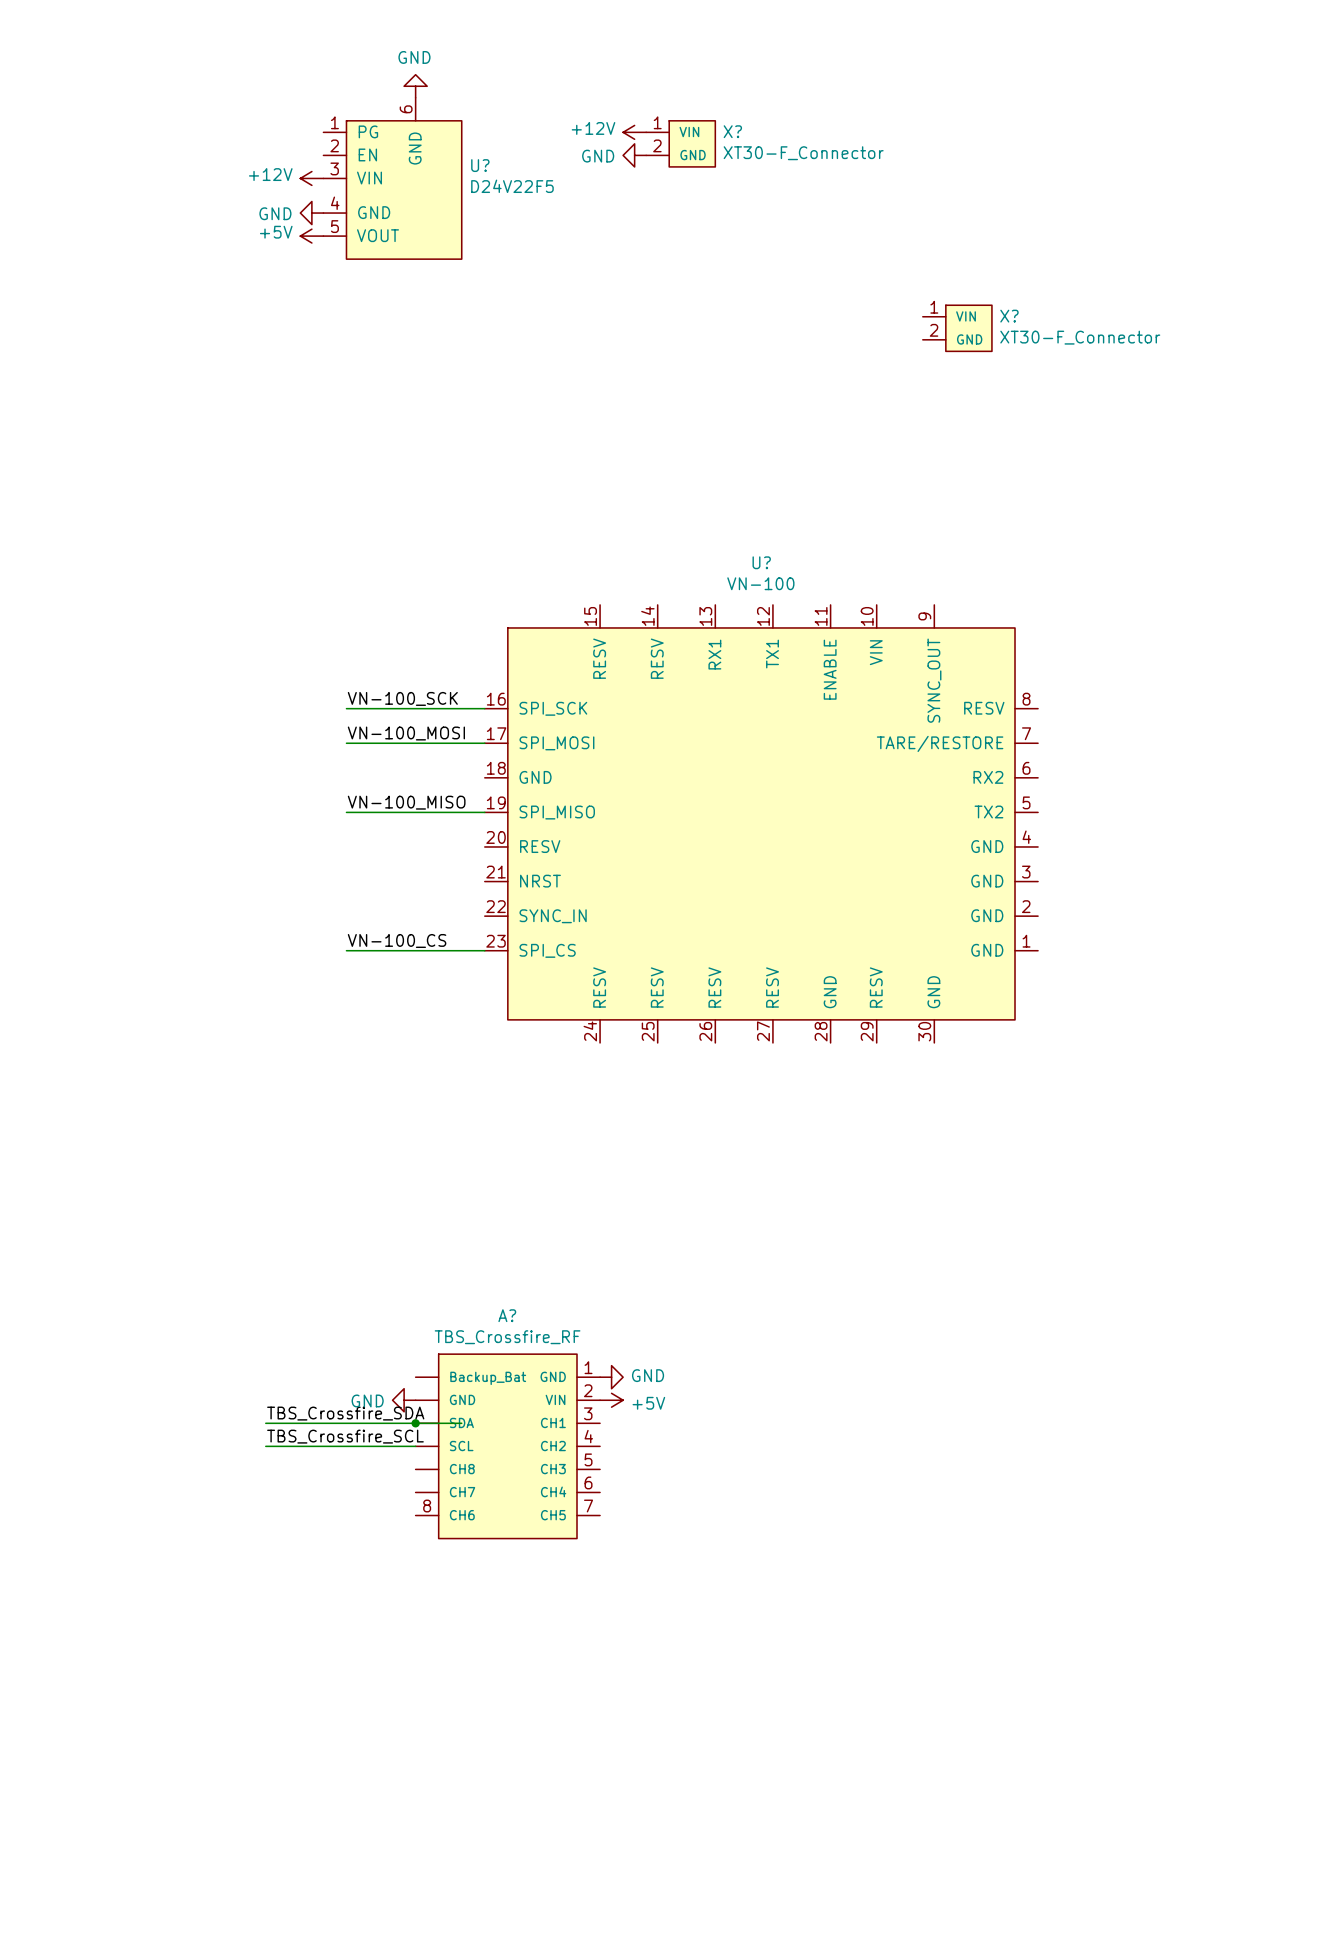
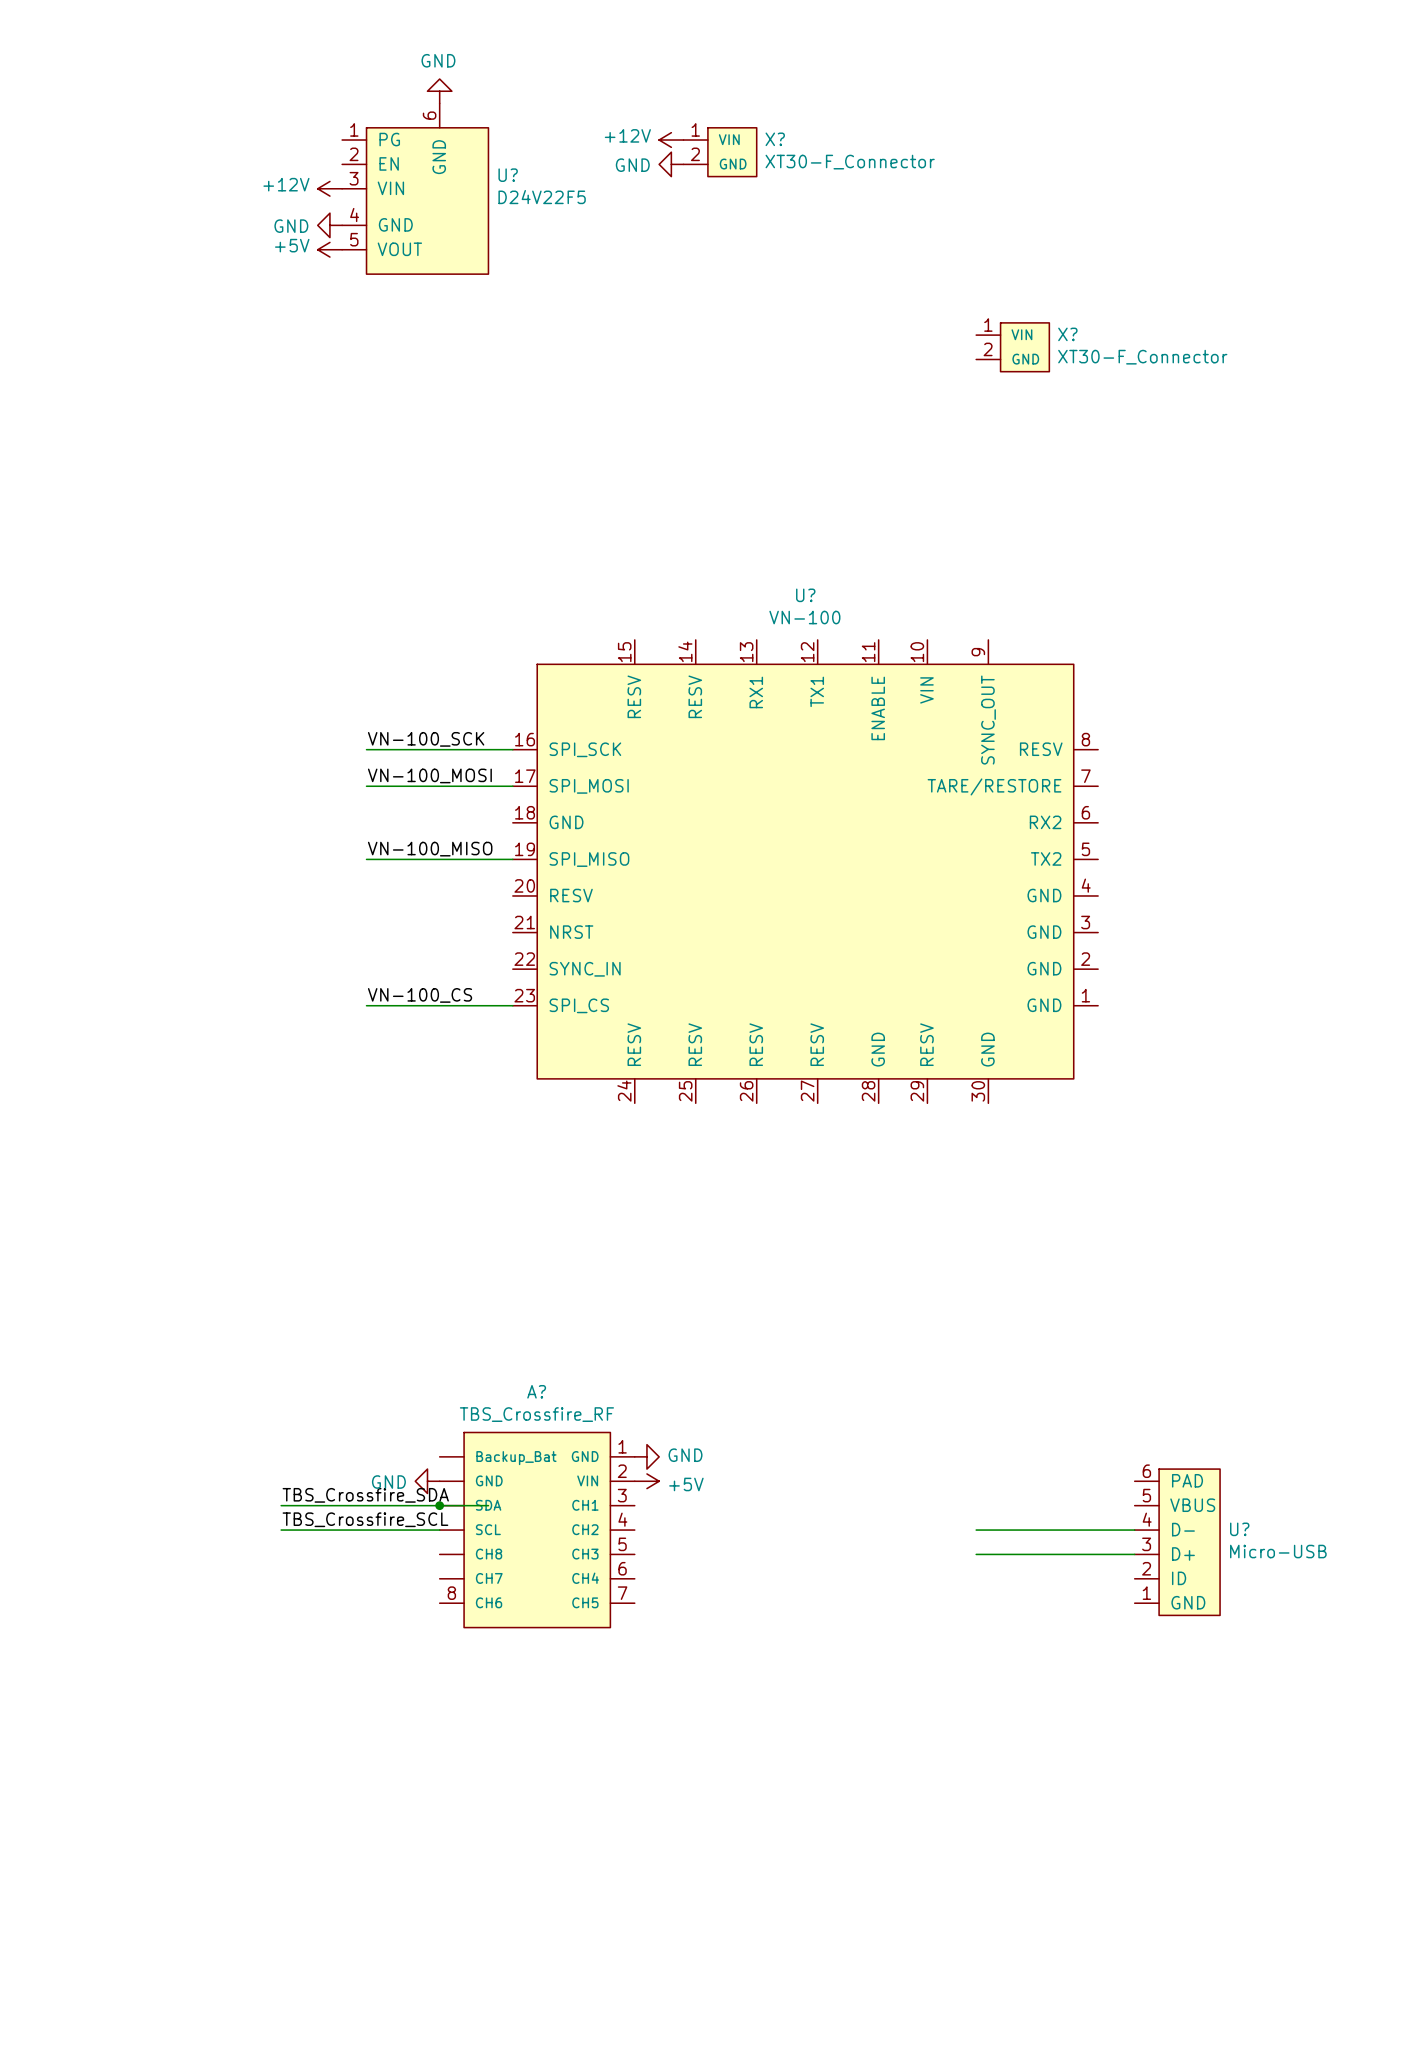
wire: none -> (976, 1530) (1134, 1530)
U?: none -> Micro-USB (1177, 1542)
wire: none -> (976, 1554) (1134, 1554)

